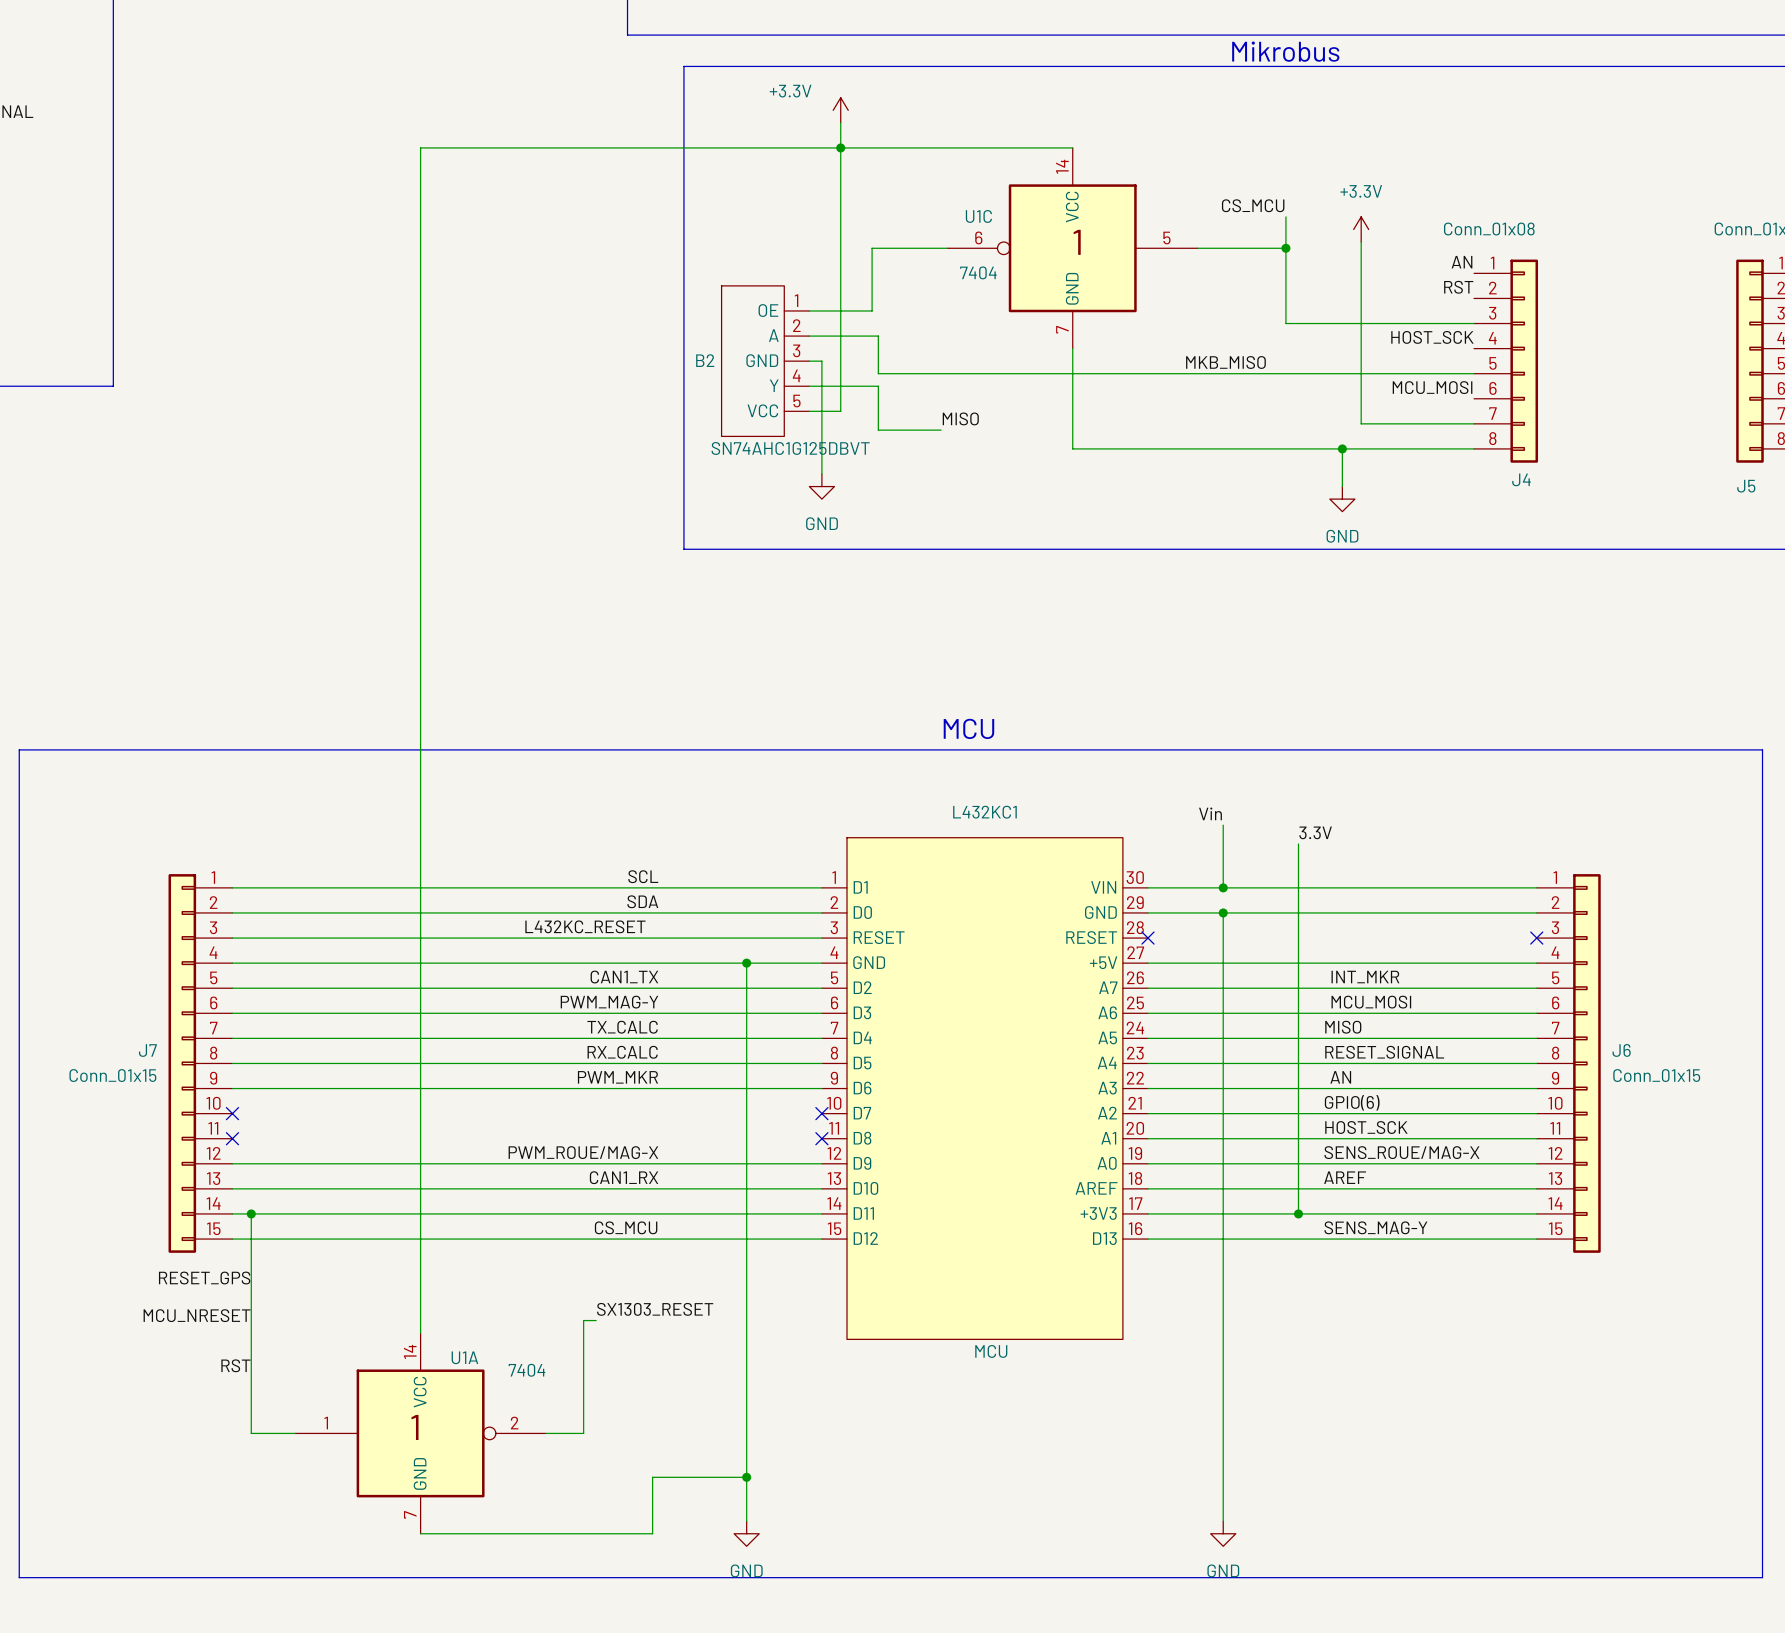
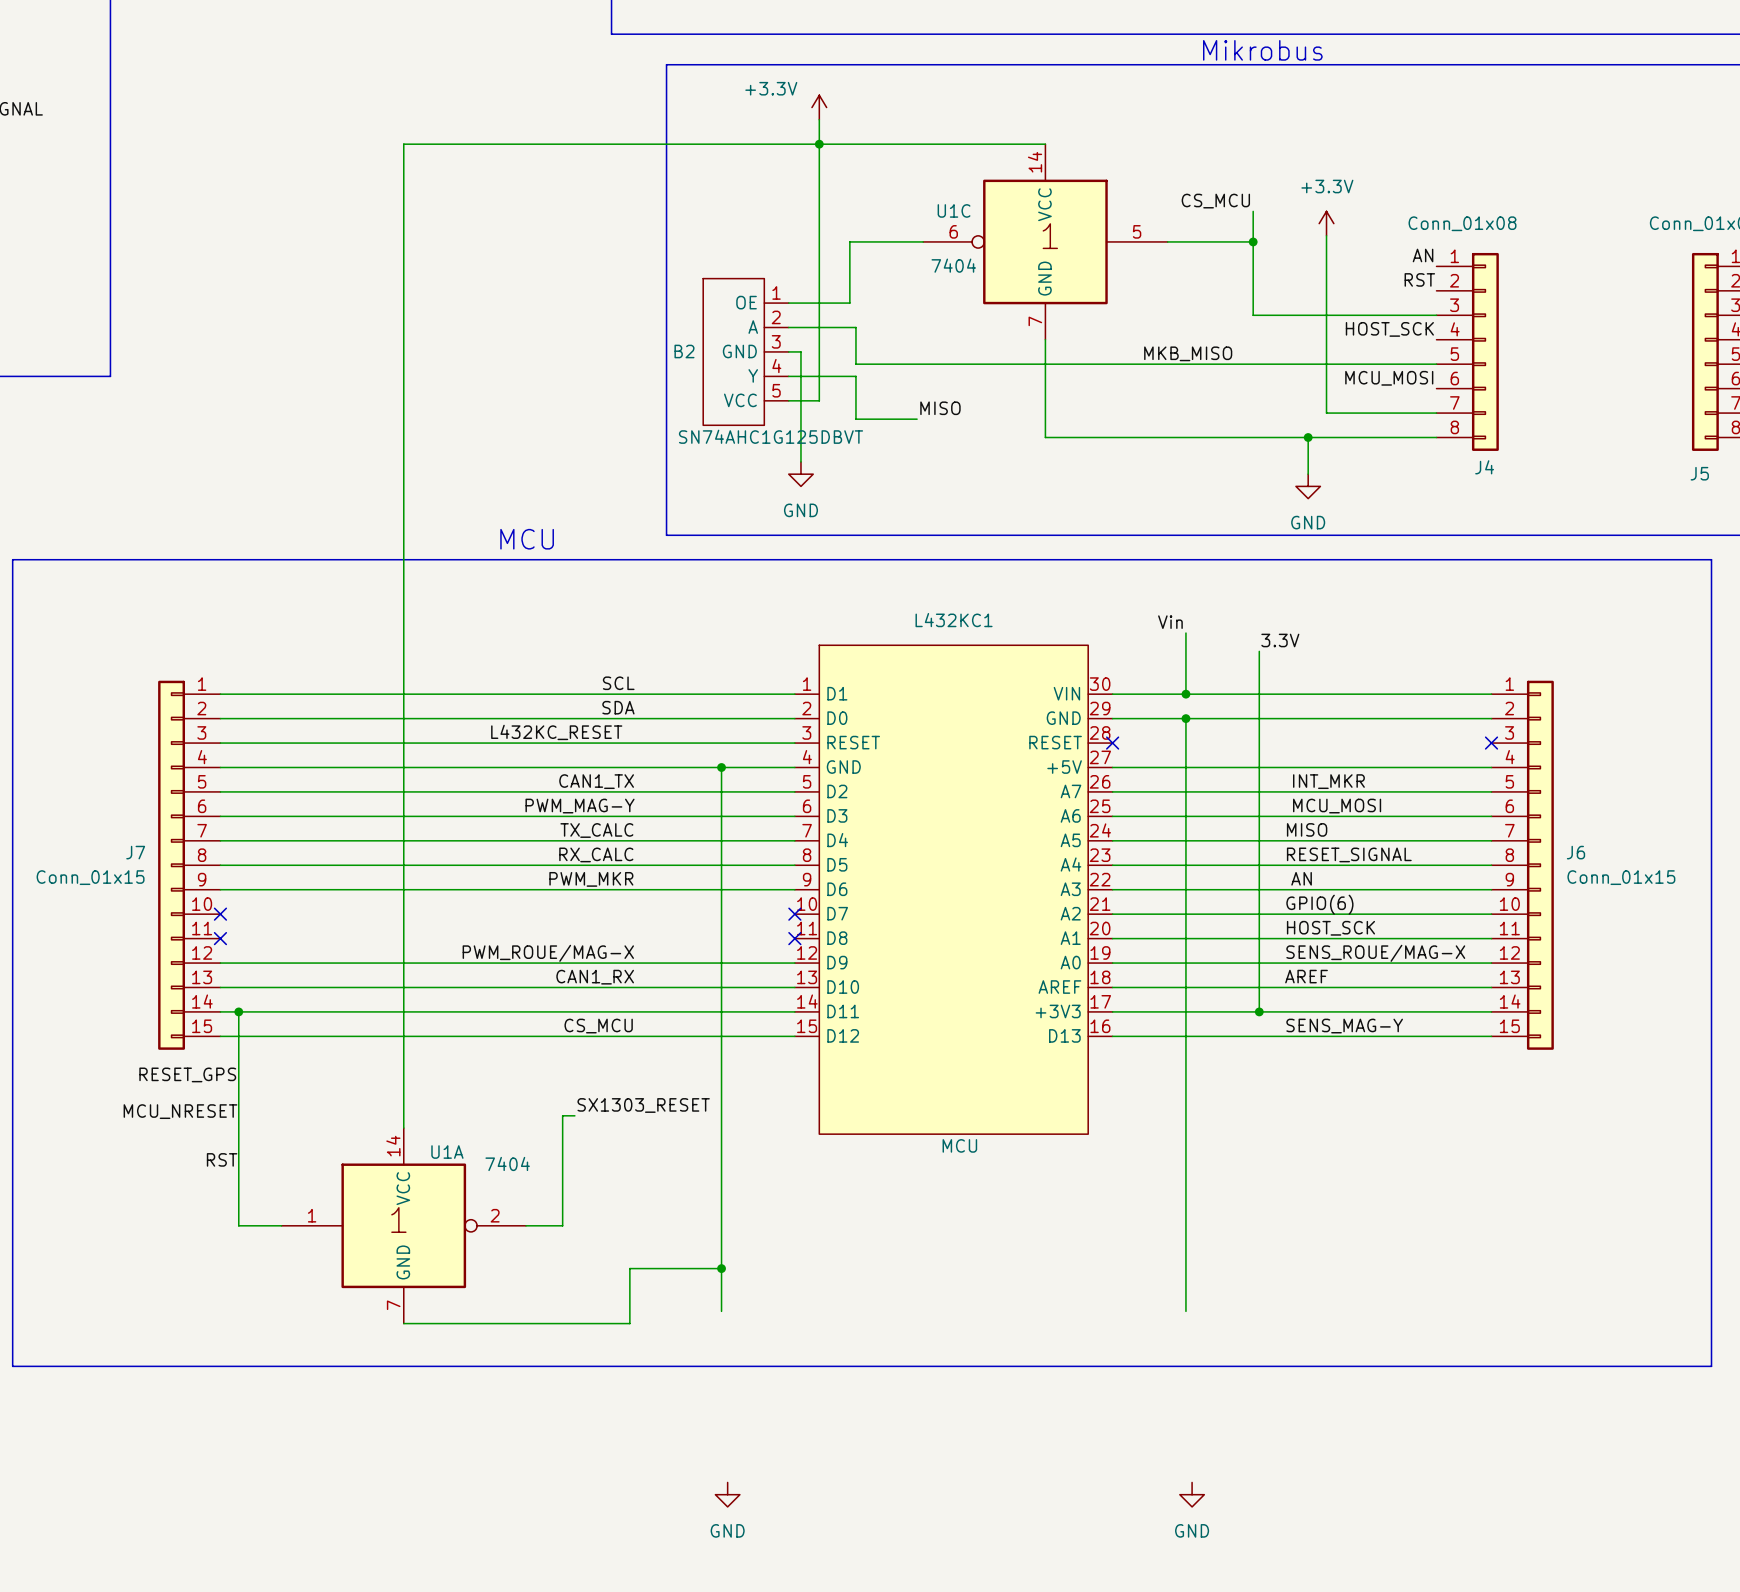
wire: (420, 147) (420, 1333) -> (409, 144) (403, 144) (403, 1128)
text: none -> MCU (527, 539)
wire: none -> (220, 694) (794, 694)
wire: none -> (1112, 694) (1491, 694)
junction: none -> (1185, 694)
text: MCU (968, 728) -> none
wire: none -> (220, 718) (794, 718)
wire: none -> (1112, 718) (1491, 718)
junction: none -> (1185, 718)
line: (19, 749) (19, 1577) (1762, 1577) (1762, 749) (19, 749) -> (12, 559) (12, 1366) (1711, 1366) (1711, 559) (12, 559)
no-connect mark: none -> (1112, 743)
no-connect mark: none -> (1491, 743)
junction: none -> (721, 767)
wire: none -> (1112, 767) (1491, 767)
wire: none -> (220, 791) (794, 791)
wire: none -> (1112, 791) (1491, 791)
label position: Vin (1210, 813) -> Vin (1170, 622)
wire: (1223, 825) (1223, 887) -> (1185, 633) (1185, 694)
label position: 3.3V (1315, 832) -> 3.3V (1280, 640)
wire: none -> (220, 816) (794, 816)
wire: none -> (1112, 816) (1491, 816)
wire: (1298, 843) (1298, 1213) -> (1259, 651) (1259, 1011)
label position: SCL (643, 876) -> SCL (618, 683)
junction: (1223, 887) -> none
label position: SDA (642, 901) -> SDA (618, 707)
wire: (1223, 912) (1223, 1521) -> (1185, 718) (1185, 1311)
junction: (1223, 912) -> none
label position: L432KC_RESET (585, 926) -> L432KC_RESET (556, 732)
no-connect mark: none -> (220, 914)
wire: (232, 938) (821, 938) -> (220, 743) (794, 743)
no-connect mark: none -> (794, 914)
no-connect mark: (1147, 938) -> none
no-connect mark: (1536, 938) -> none
no-connect mark: none -> (220, 938)
wire: (232, 963) (821, 963) -> (220, 767) (794, 767)
wire: (746, 963) (746, 1521) -> (721, 767) (721, 1311)
junction: (746, 963) -> none
no-connect mark: none -> (794, 938)
label position: CAN1_TX (624, 977) -> CAN1_TX (596, 781)
label position: INT_MKR (1365, 977) -> INT_MKR (1328, 781)
label position: PWM_MAG-Y (609, 1002) -> PWM_MAG-Y (580, 806)
label position: MCU_MOSI (1371, 1002) -> MCU_MOSI (1337, 806)
label position: TX_CALC (622, 1027) -> TX_CALC (596, 830)
label position: MISO (1343, 1027) -> MISO (1307, 829)
junction: none -> (238, 1011)
junction: none -> (1259, 1011)
label position: RX_CALC (622, 1052) -> RX_CALC (596, 854)
label position: RESET_SIGNAL (1384, 1052) -> RESET_SIGNAL (1349, 854)
J7 position: (200, 1063) -> (189, 865)
J6 position: (1568, 1063) -> (1522, 865)
label position: PWM_MKR (617, 1077) -> PWM_MKR (591, 879)
label position: AN (1340, 1077) -> AN (1301, 878)
wire: (232, 1088) (821, 1088) -> (220, 840) (794, 840)
L432KC1 position: (984, 1088) -> (953, 889)
wire: (1147, 1088) (1536, 1088) -> (1112, 840) (1491, 840)
label position: GPIO(6) (1352, 1102) -> GPIO(6) (1319, 904)
no-connect mark: (232, 1113) -> none
no-connect mark: (821, 1113) -> none
wire: (1147, 1113) (1536, 1113) -> (1112, 914) (1491, 914)
label position: HOST_SCK (1366, 1127) -> HOST_SCK (1330, 928)
no-connect mark: (232, 1138) -> none
no-connect mark: (821, 1138) -> none
wire: (1147, 1138) (1536, 1138) -> none
label position: PWM_ROUE/MAG-X (583, 1152) -> PWM_ROUE/MAG-X (548, 953)
label position: SENS_ROUE/MAG-X (1401, 1152) -> SENS_ROUE/MAG-X (1375, 953)
wire: (232, 1163) (821, 1163) -> none
wire: (1147, 1163) (1536, 1163) -> none
label position: CAN1_RX (624, 1177) -> CAN1_RX (595, 977)
label position: AREF (1345, 1177) -> AREF (1306, 976)
wire: (232, 1188) (821, 1188) -> none
wire: (1147, 1188) (1536, 1188) -> none
wire: (232, 1213) (821, 1213) -> none
wire: (251, 1213) (251, 1433) (295, 1433) -> (238, 1011) (238, 1225) (281, 1225)
junction: (251, 1213) -> none
wire: (1147, 1213) (1536, 1213) -> none
junction: (1298, 1213) -> none
label position: CS_MCU (626, 1227) -> CS_MCU (598, 1026)
label position: SENS_MAG-Y (1375, 1227) -> SENS_MAG-Y (1344, 1026)
wire: (232, 1239) (821, 1239) -> none
wire: (1147, 1239) (1536, 1239) -> none
label position: RESET_GPS (204, 1278) -> RESET_GPS (187, 1074)
junction: none -> (721, 1268)
label position: SX1303_RESET (655, 1309) -> SX1303_RESET (643, 1105)
label position: MCU_NRESET (197, 1315) -> MCU_NRESET (180, 1111)
wire: (596, 1320) (583, 1320) (583, 1433) (546, 1433) -> (574, 1115) (562, 1115) (562, 1225) (525, 1225)
label position: RST (235, 1365) -> RST (222, 1159)
U1A position: (420, 1433) -> (403, 1225)
wire: (746, 1477) (652, 1477) (652, 1533) (420, 1533) -> (721, 1268) (629, 1268) (629, 1323) (403, 1323)
junction: (746, 1477) -> none

